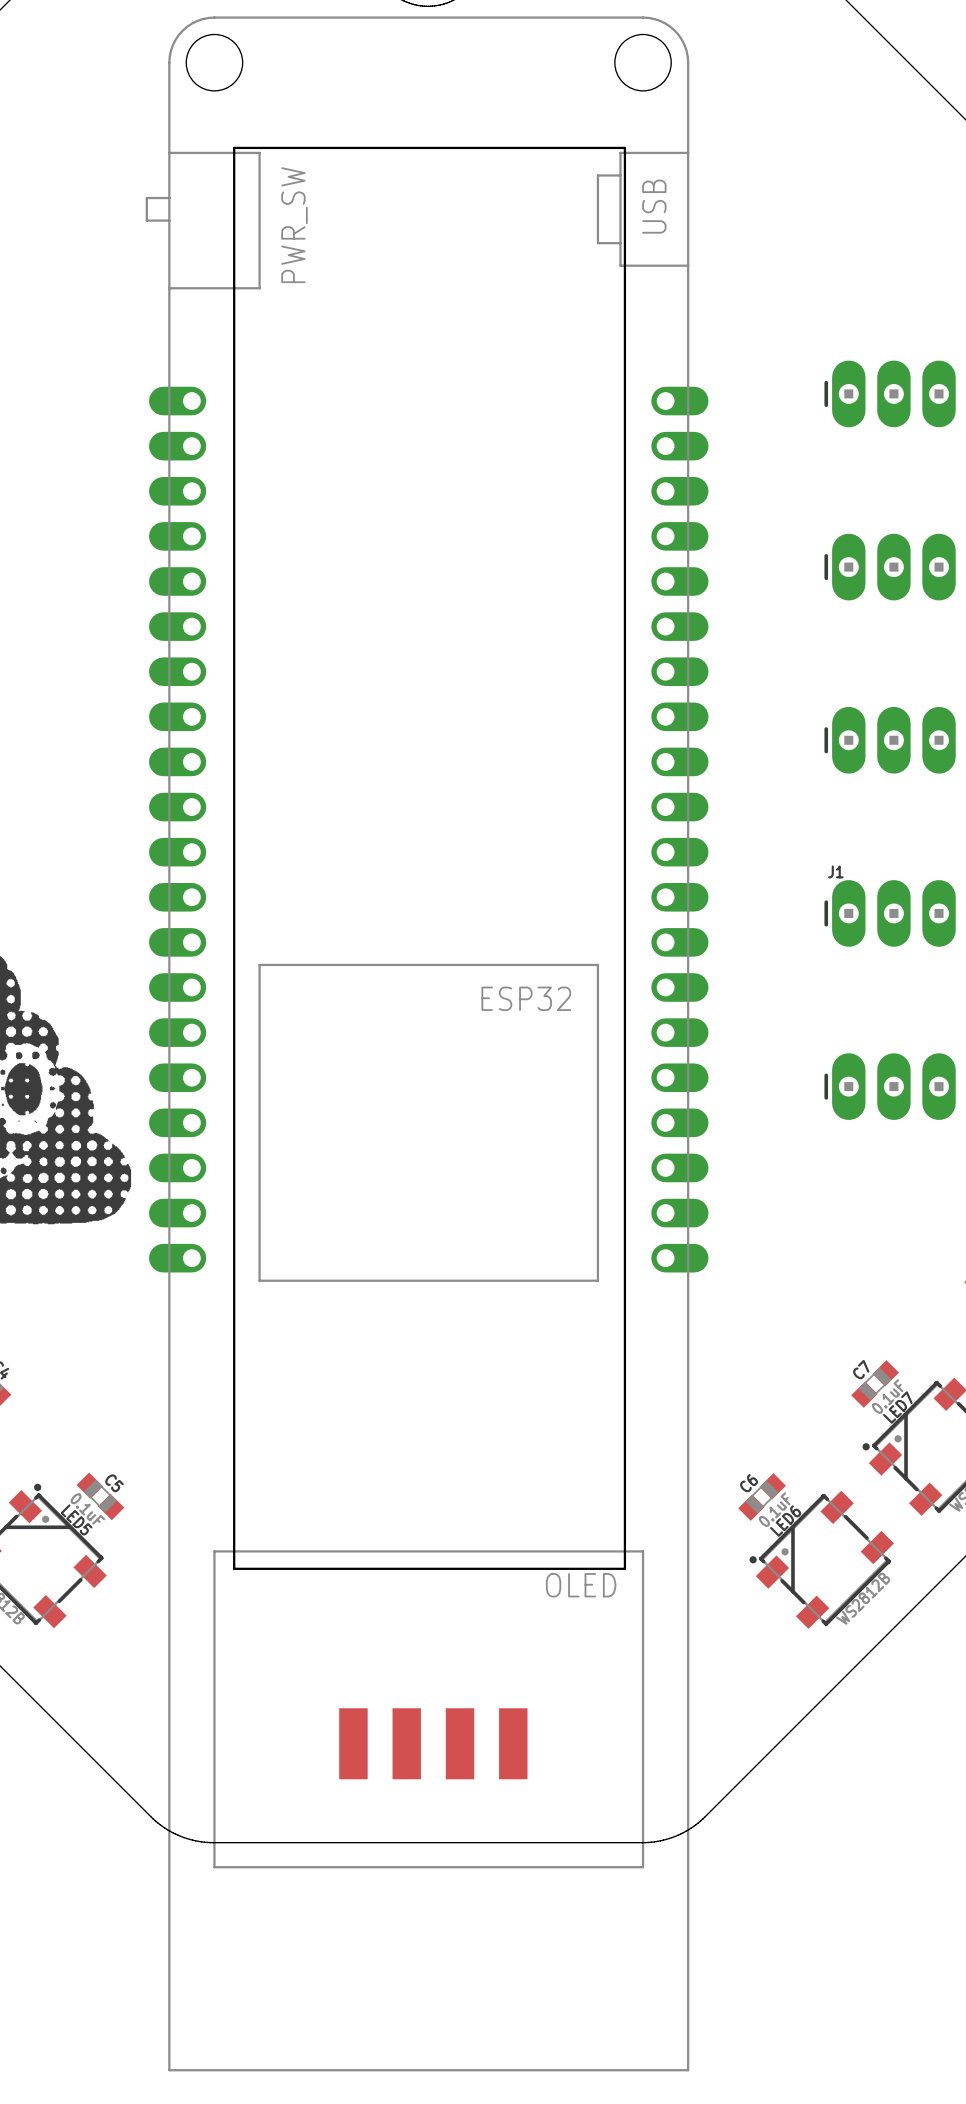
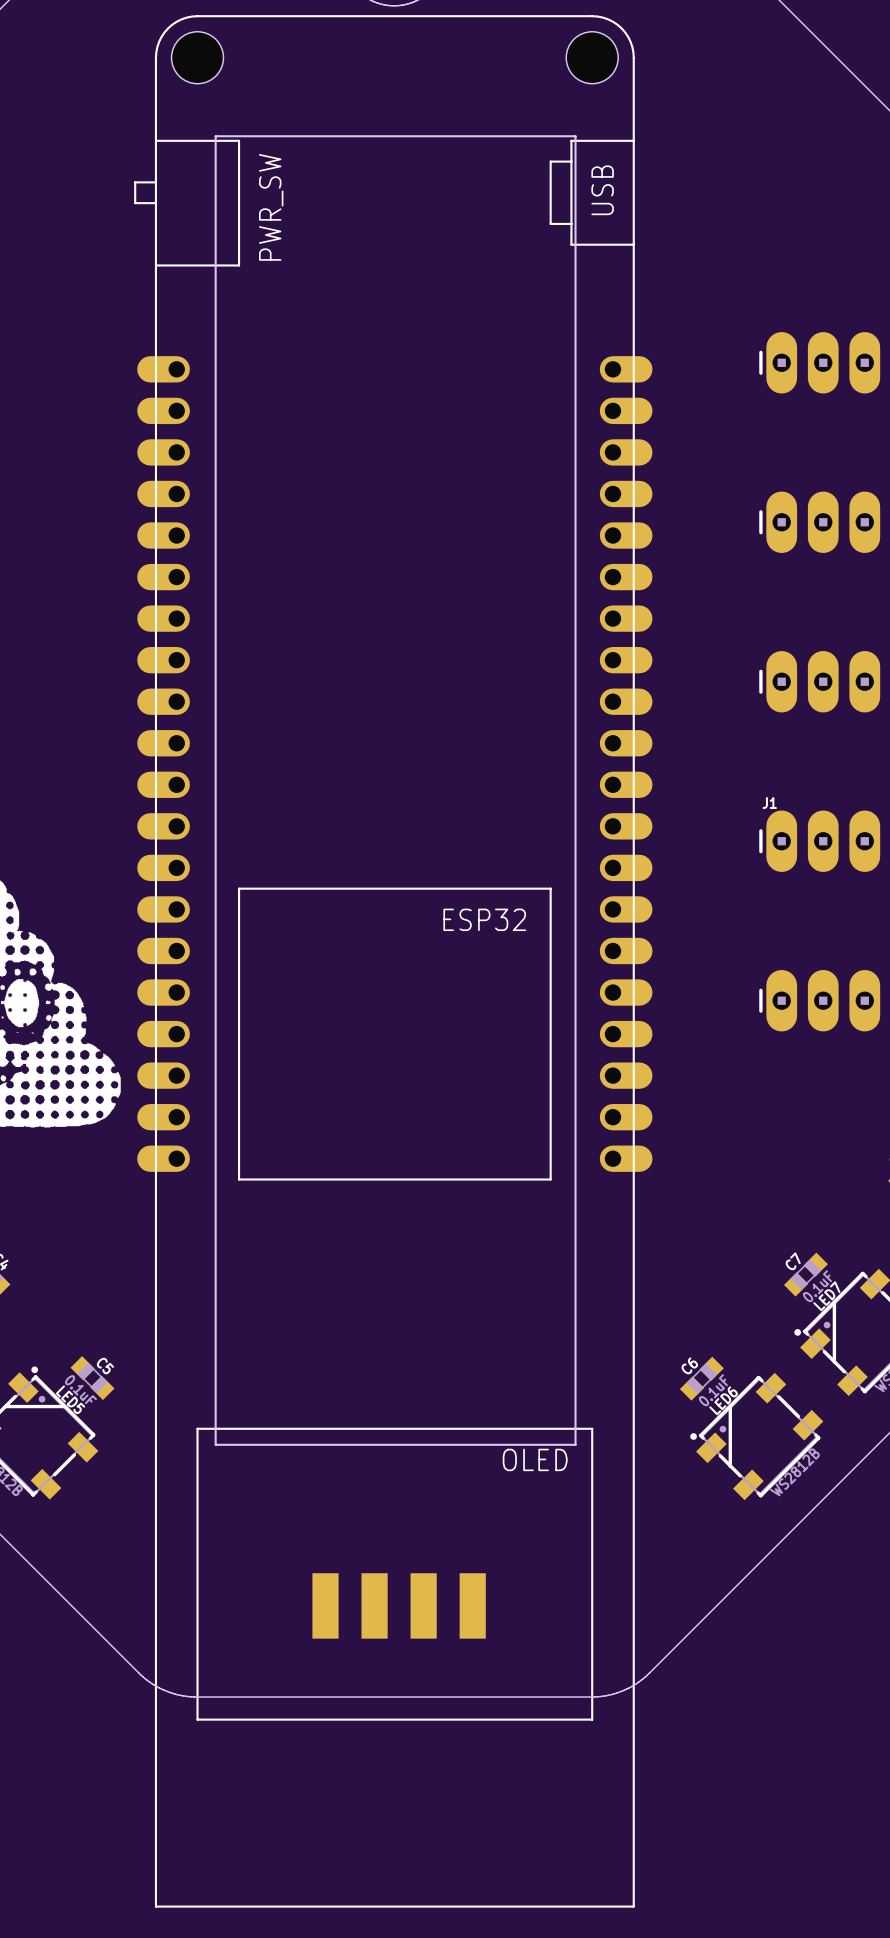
part footprint: [145, 16, 709, 2072] -> [134, 15, 653, 1908]

